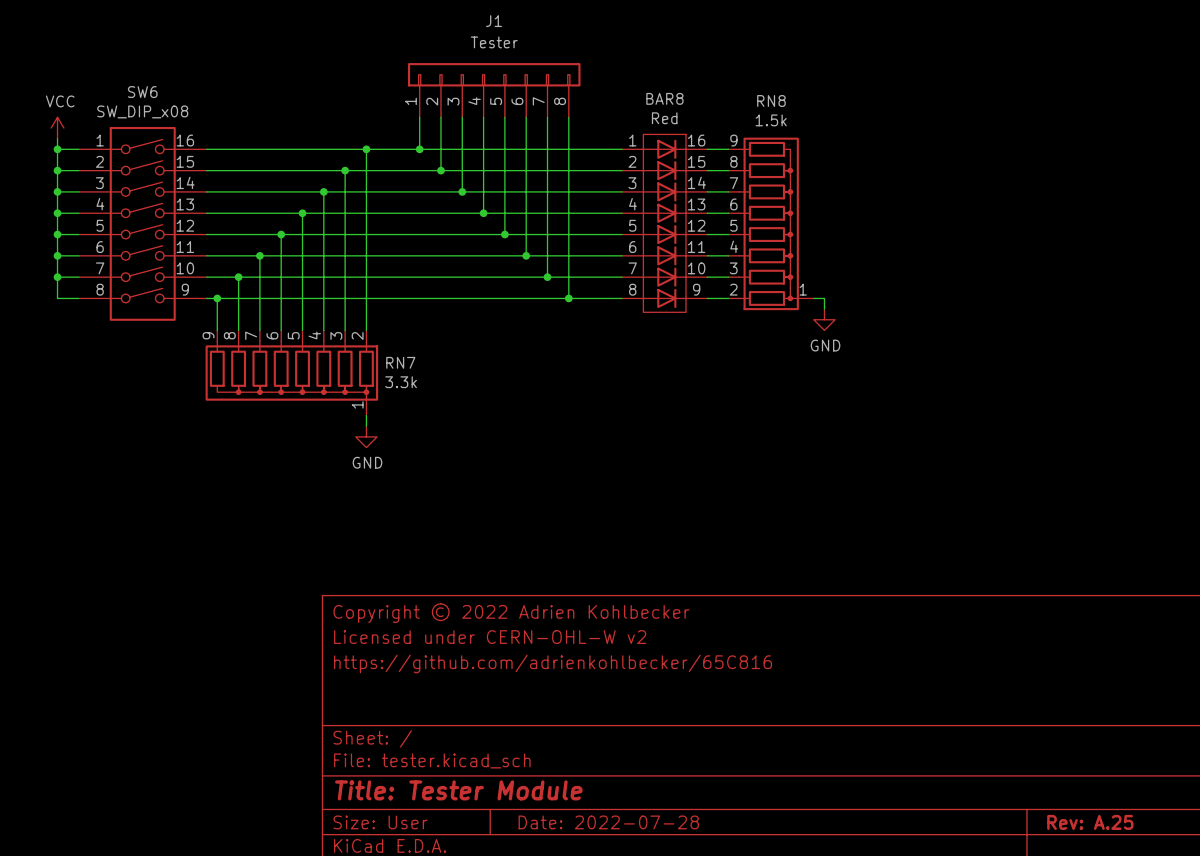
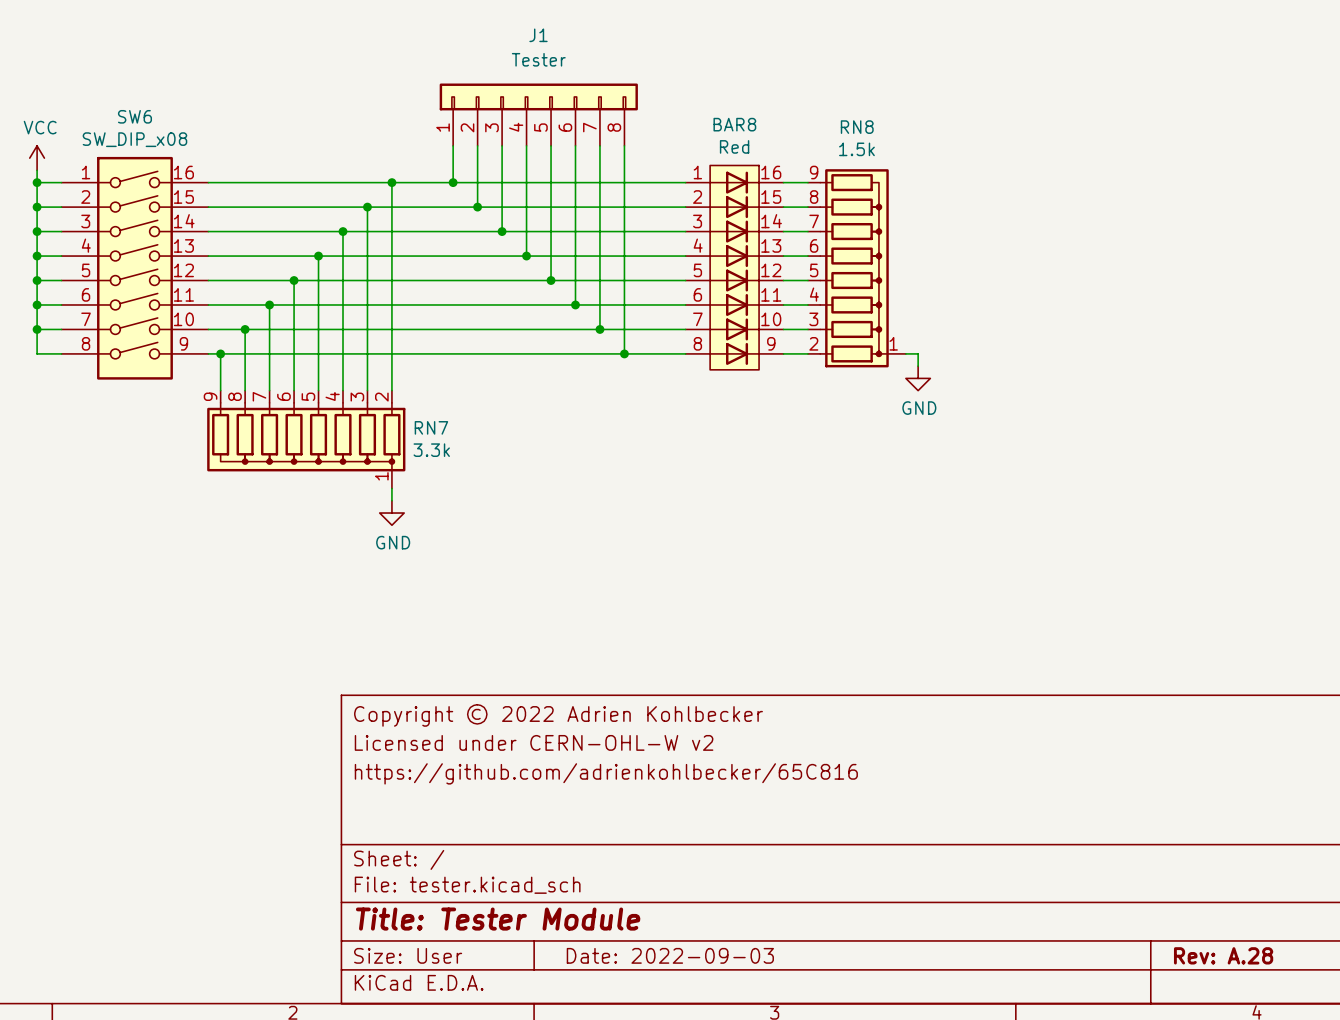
title block: Date: 2022-07-28 (608, 822) -> Date: 2022-09-03 (670, 955)
title block: Rev: A.25 (1090, 822) -> Rev: A.28 (1223, 955)

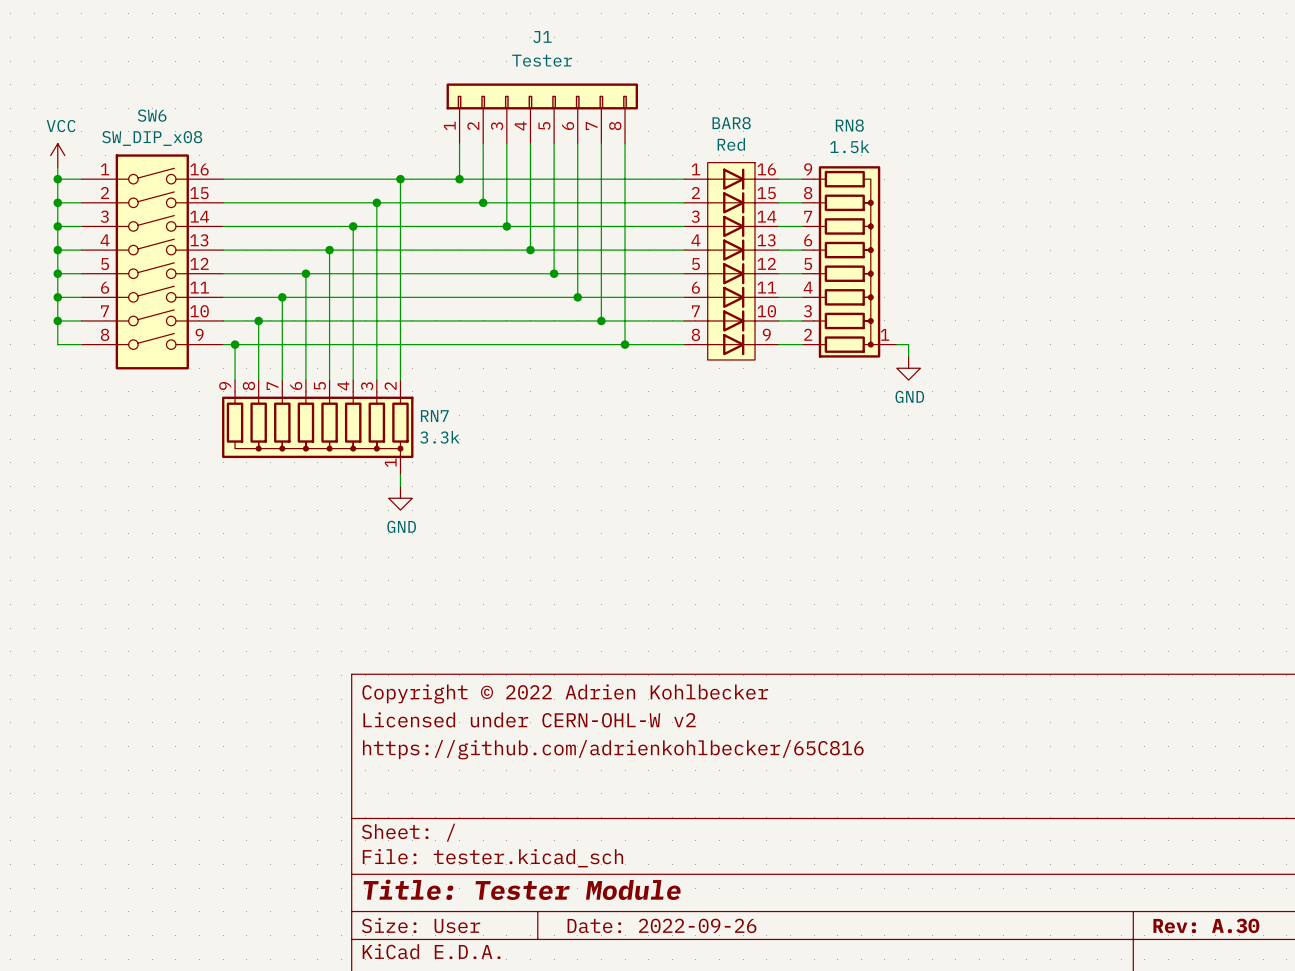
title block: Date: 2022-09-03 (670, 955) -> Date: 2022-09-26 (662, 925)
title block: Rev: A.28 (1223, 955) -> Rev: A.30 (1206, 925)

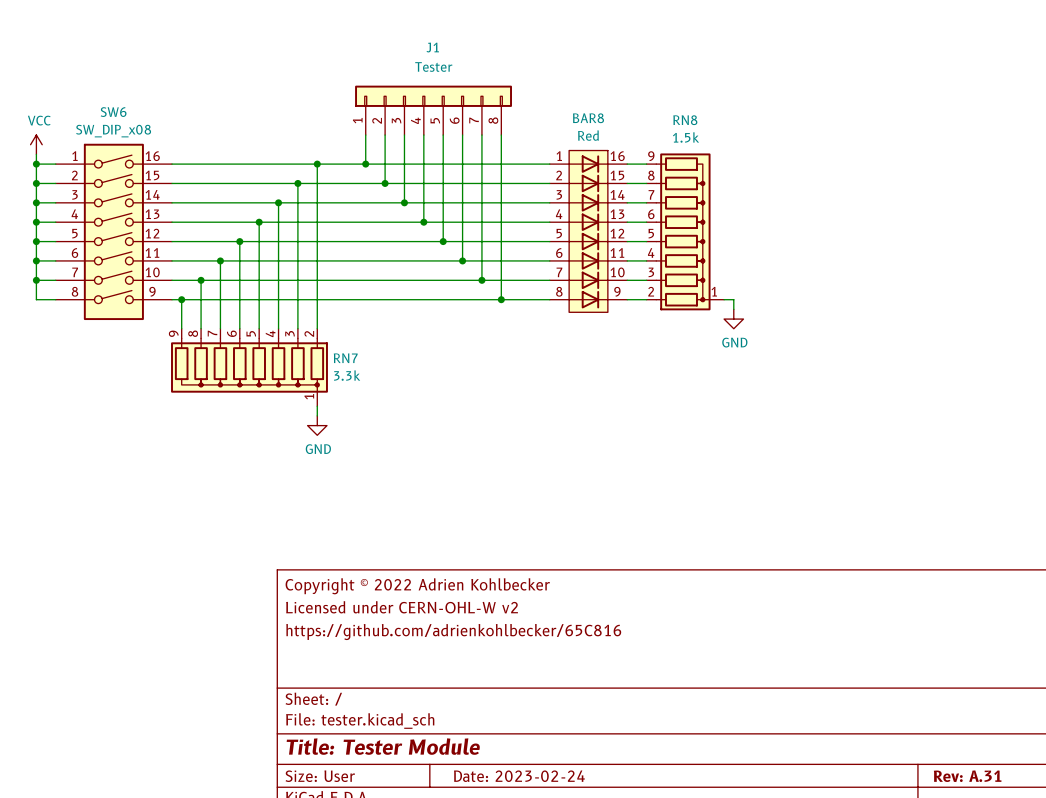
title block: Date: 2022-09-26 (662, 925) -> Date: 2023-02-24 (519, 776)
title block: Rev: A.30 (1206, 925) -> Rev: A.31 (967, 776)

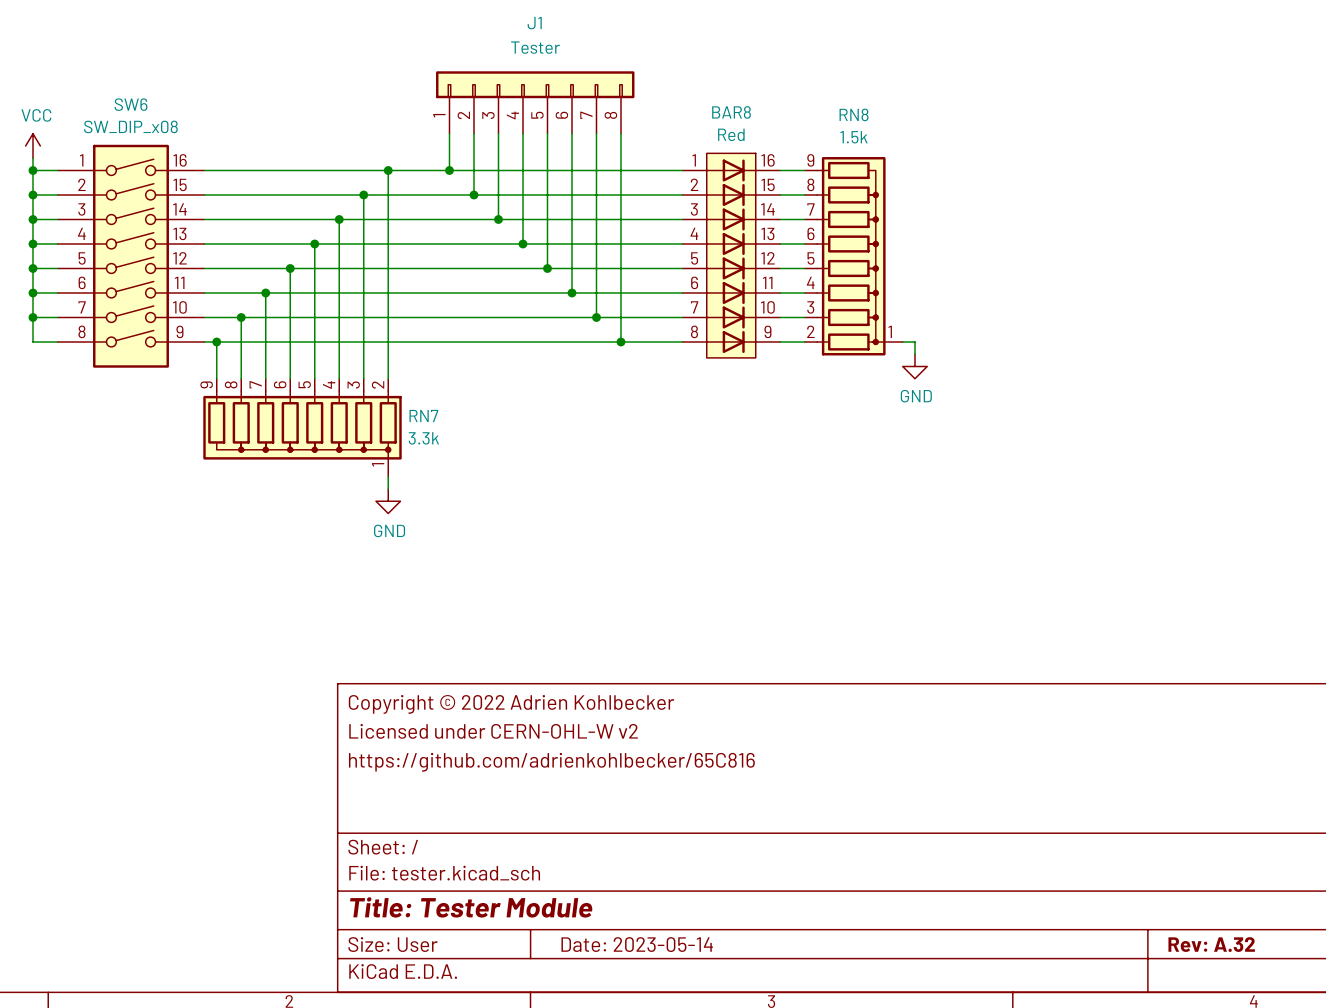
title block: Date: 2023-02-24 (519, 776) -> Date: 2023-05-14 (637, 944)
title block: Rev: A.31 (967, 776) -> Rev: A.32 (1211, 944)

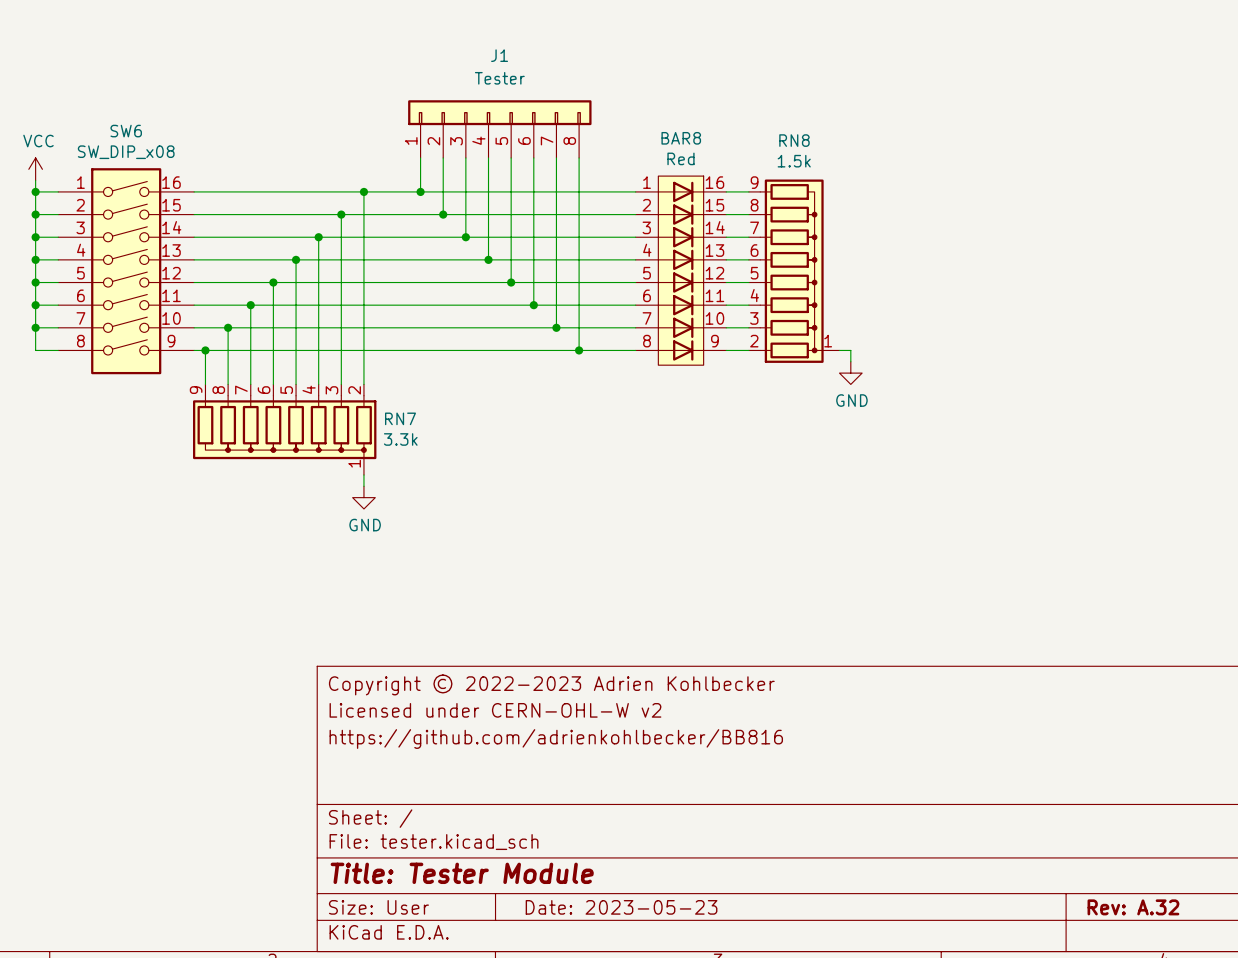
title block: Copyright © 2022 Adrien Kohlbecker (511, 704) -> Copyright © 2022-2023 Adrien Kohlbecker (551, 684)
title block: https://github.com/adrienkohlbecker/65C816 (551, 762) -> https://github.com/adrienkohlbecker/BB816 (556, 739)
title block: Date: 2023-05-14 (637, 944) -> Date: 2023-05-23 (621, 907)

